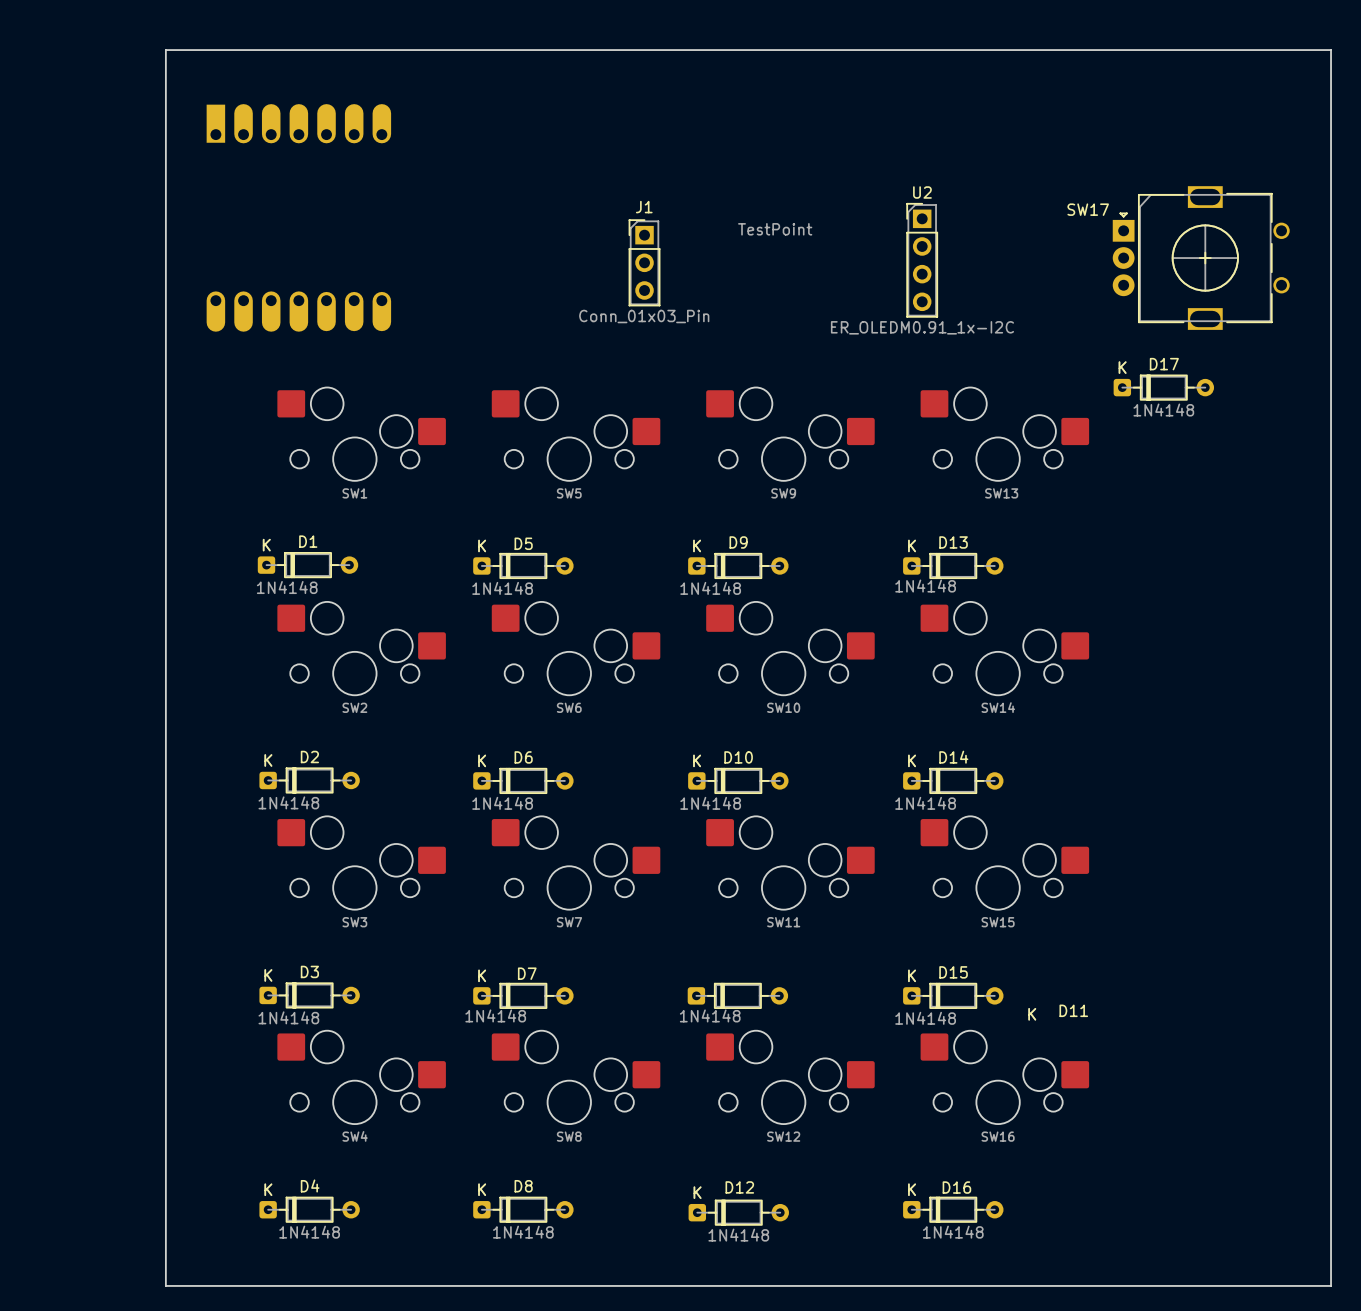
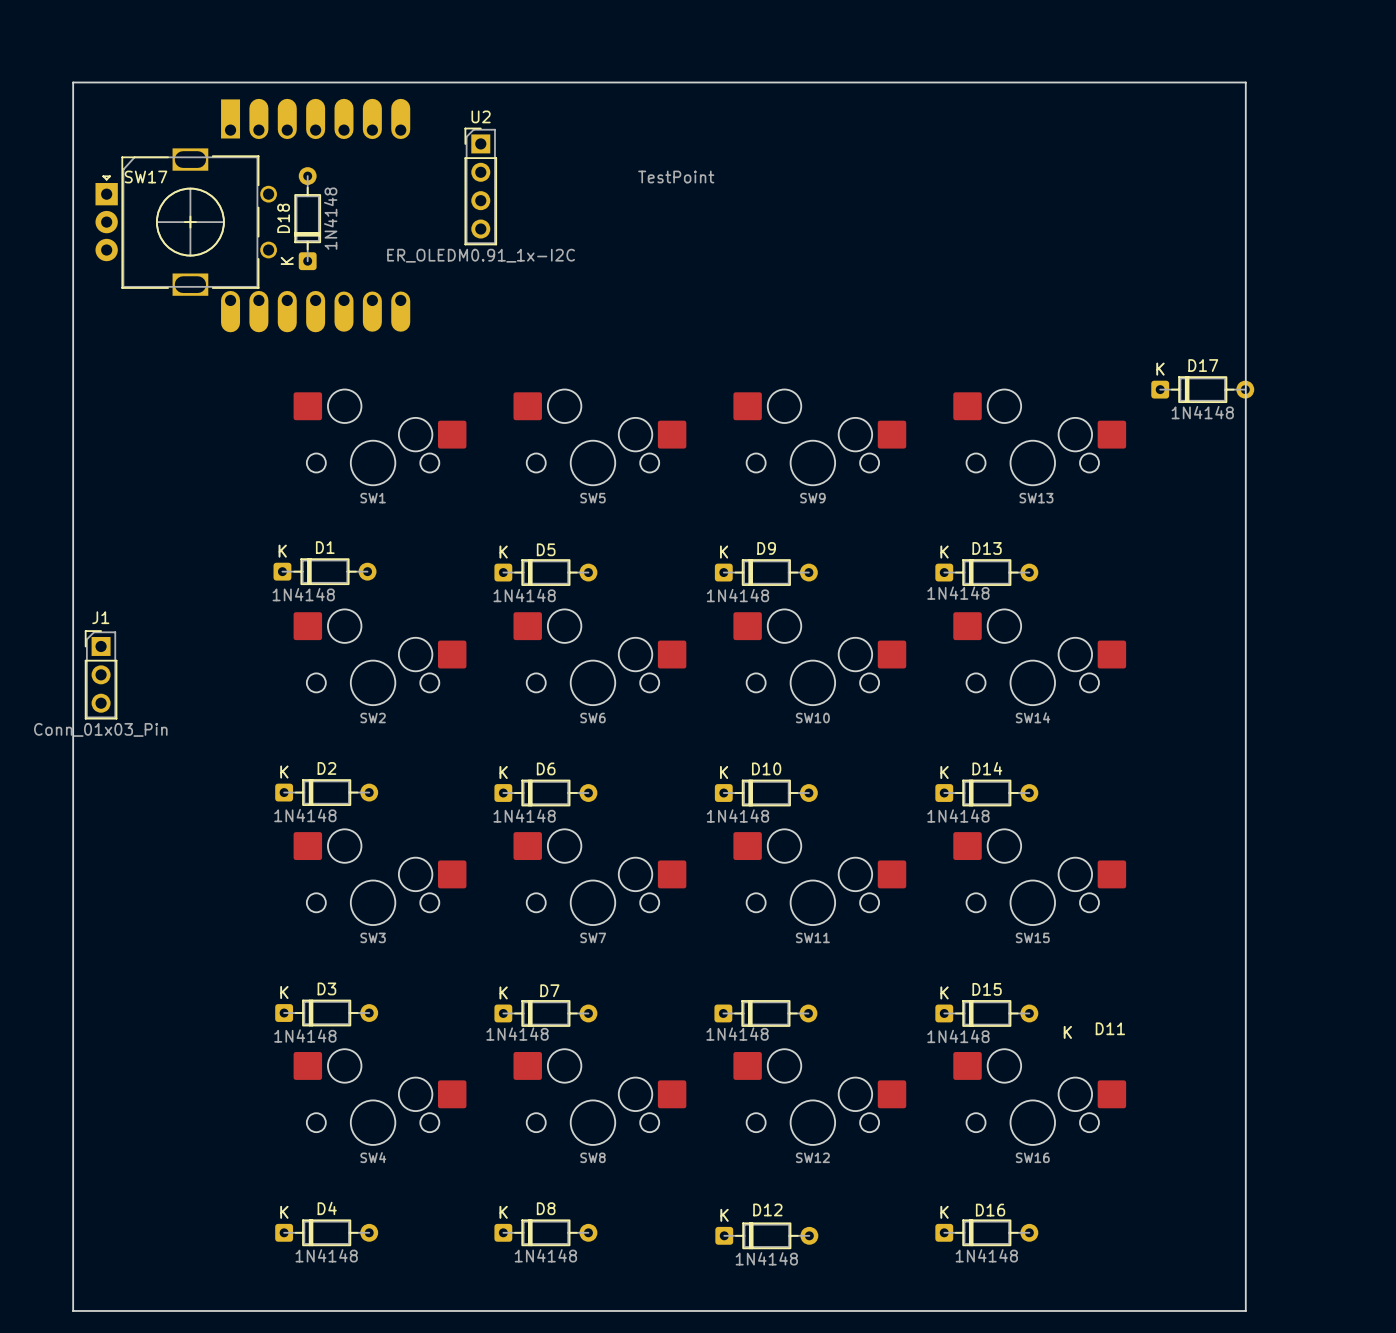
SW17 name position: SW17 (1088, 209) -> SW17 (146, 177)
D18: none -> 1N4148 (307, 218)
part position: (775, 229) -> (676, 177)
SW17 position: (1201, 258) -> (186, 222)
U2 position: (922, 260) -> (480, 186)
J1 position: (644, 262) -> (101, 674)
board edge: (165, 1285) (165, 50) (1331, 50) (1331, 1285) (1205, 1285) -> (179, 1310) (73, 1310) (73, 82) (1245, 82) (1245, 1310)

